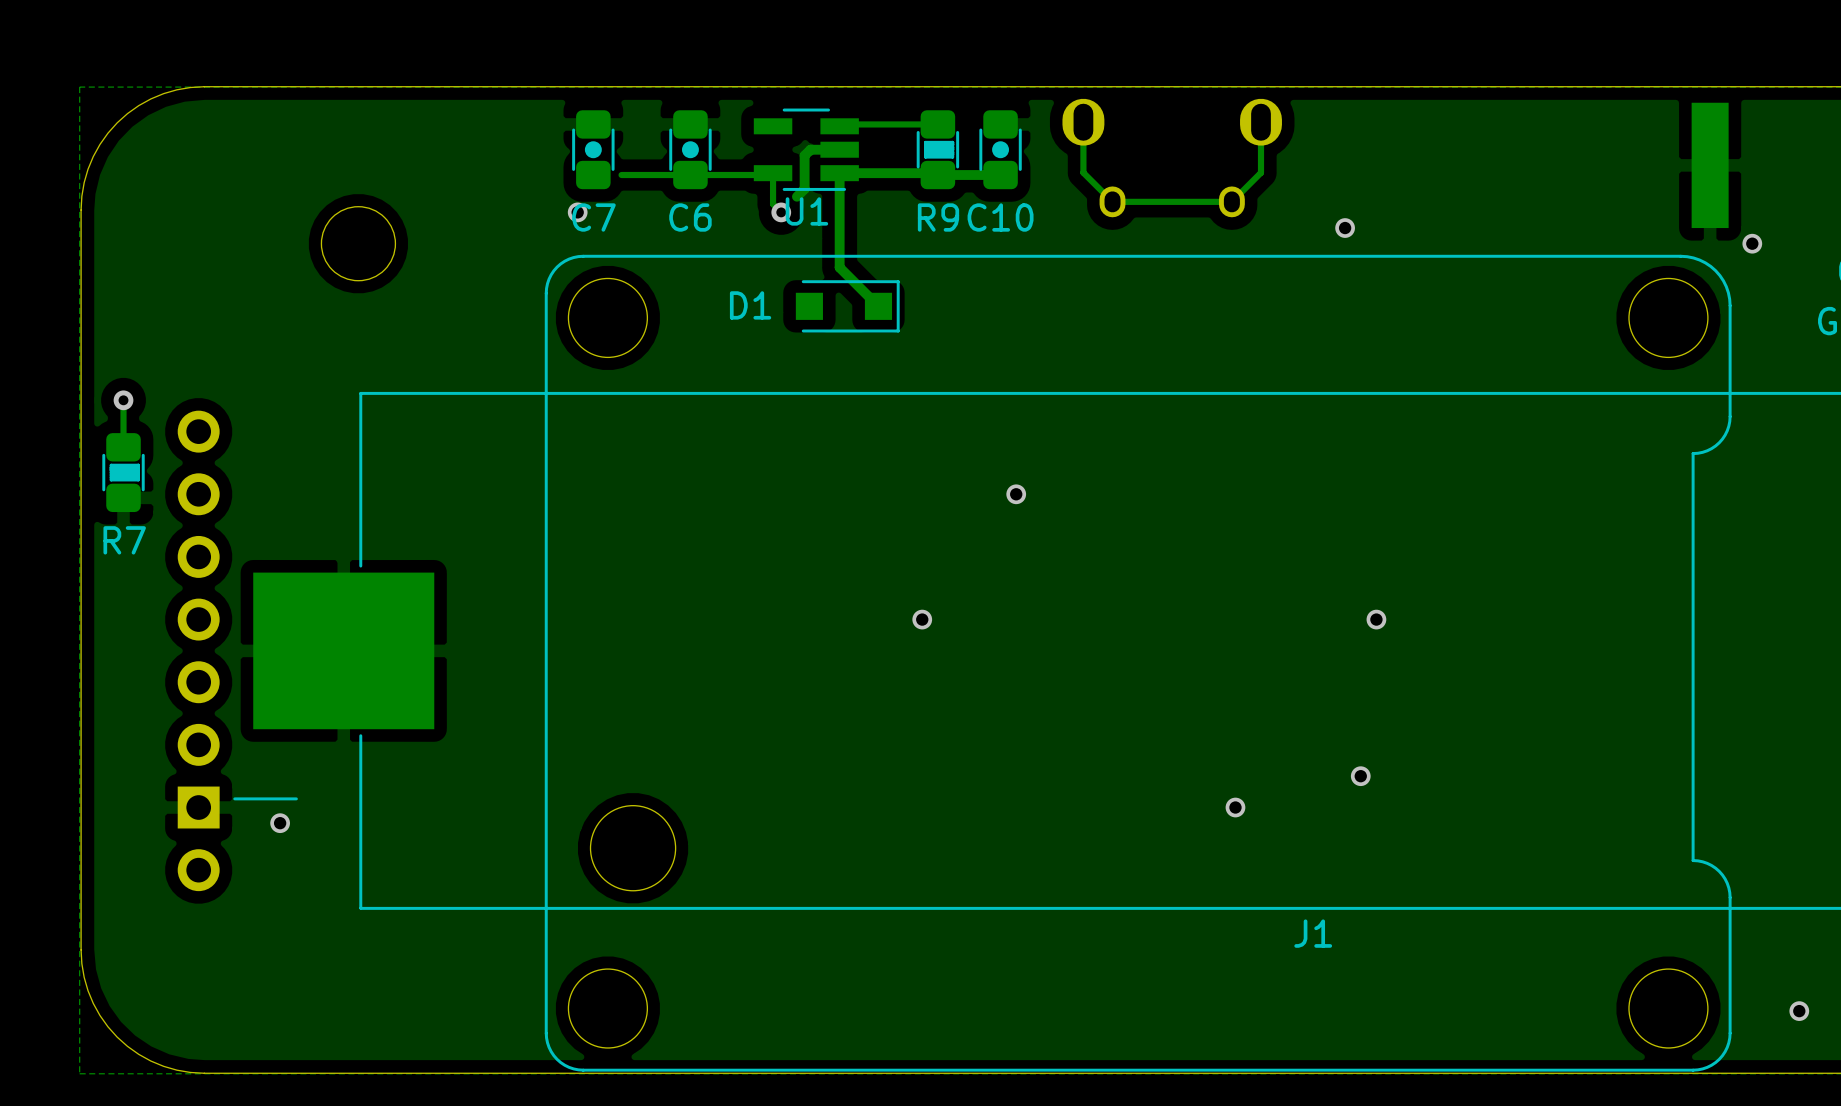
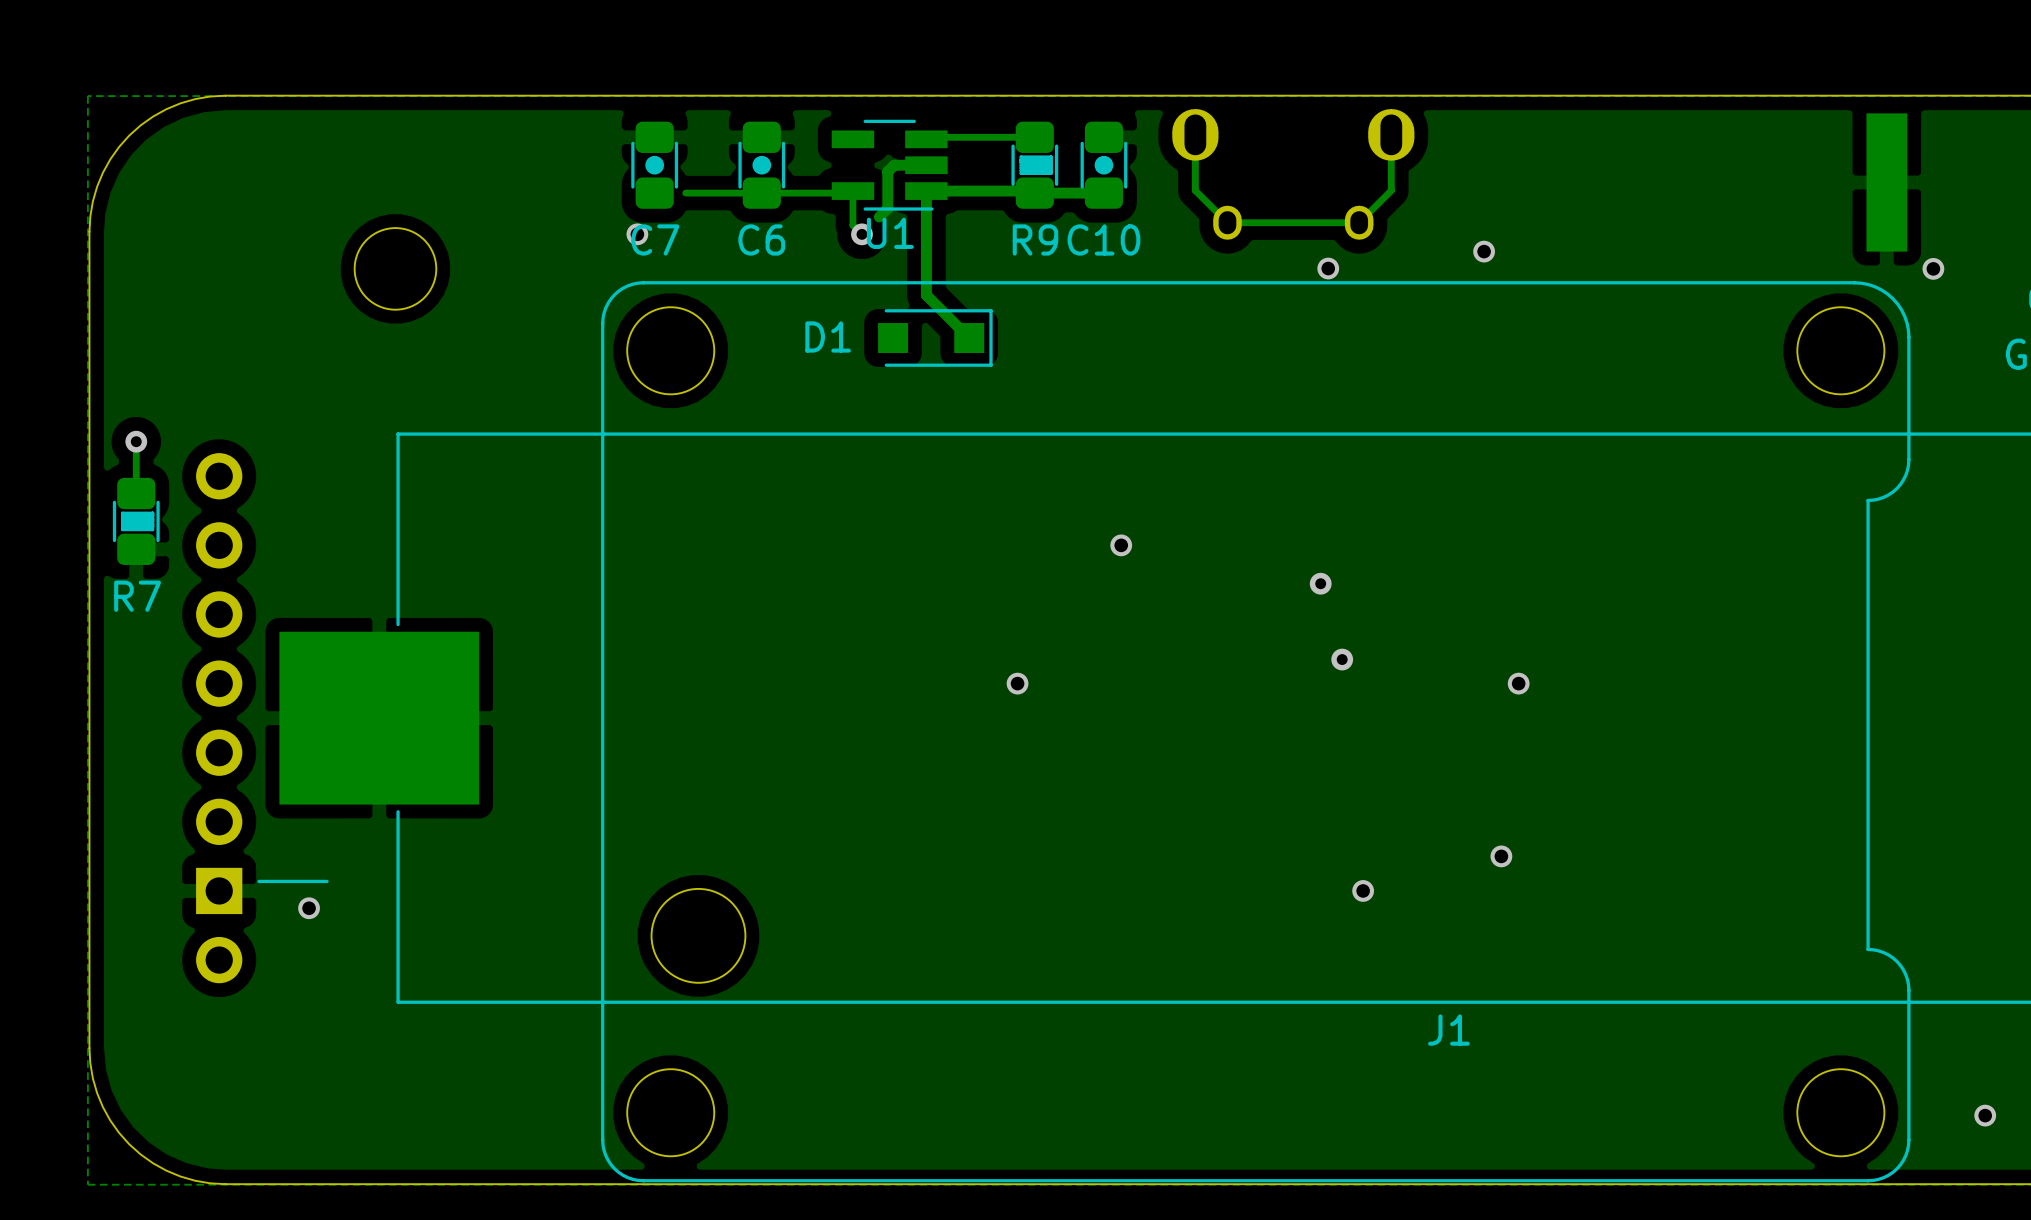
via: none -> (1328, 268)
via: none -> (1320, 583)
via: none -> (1342, 659)

